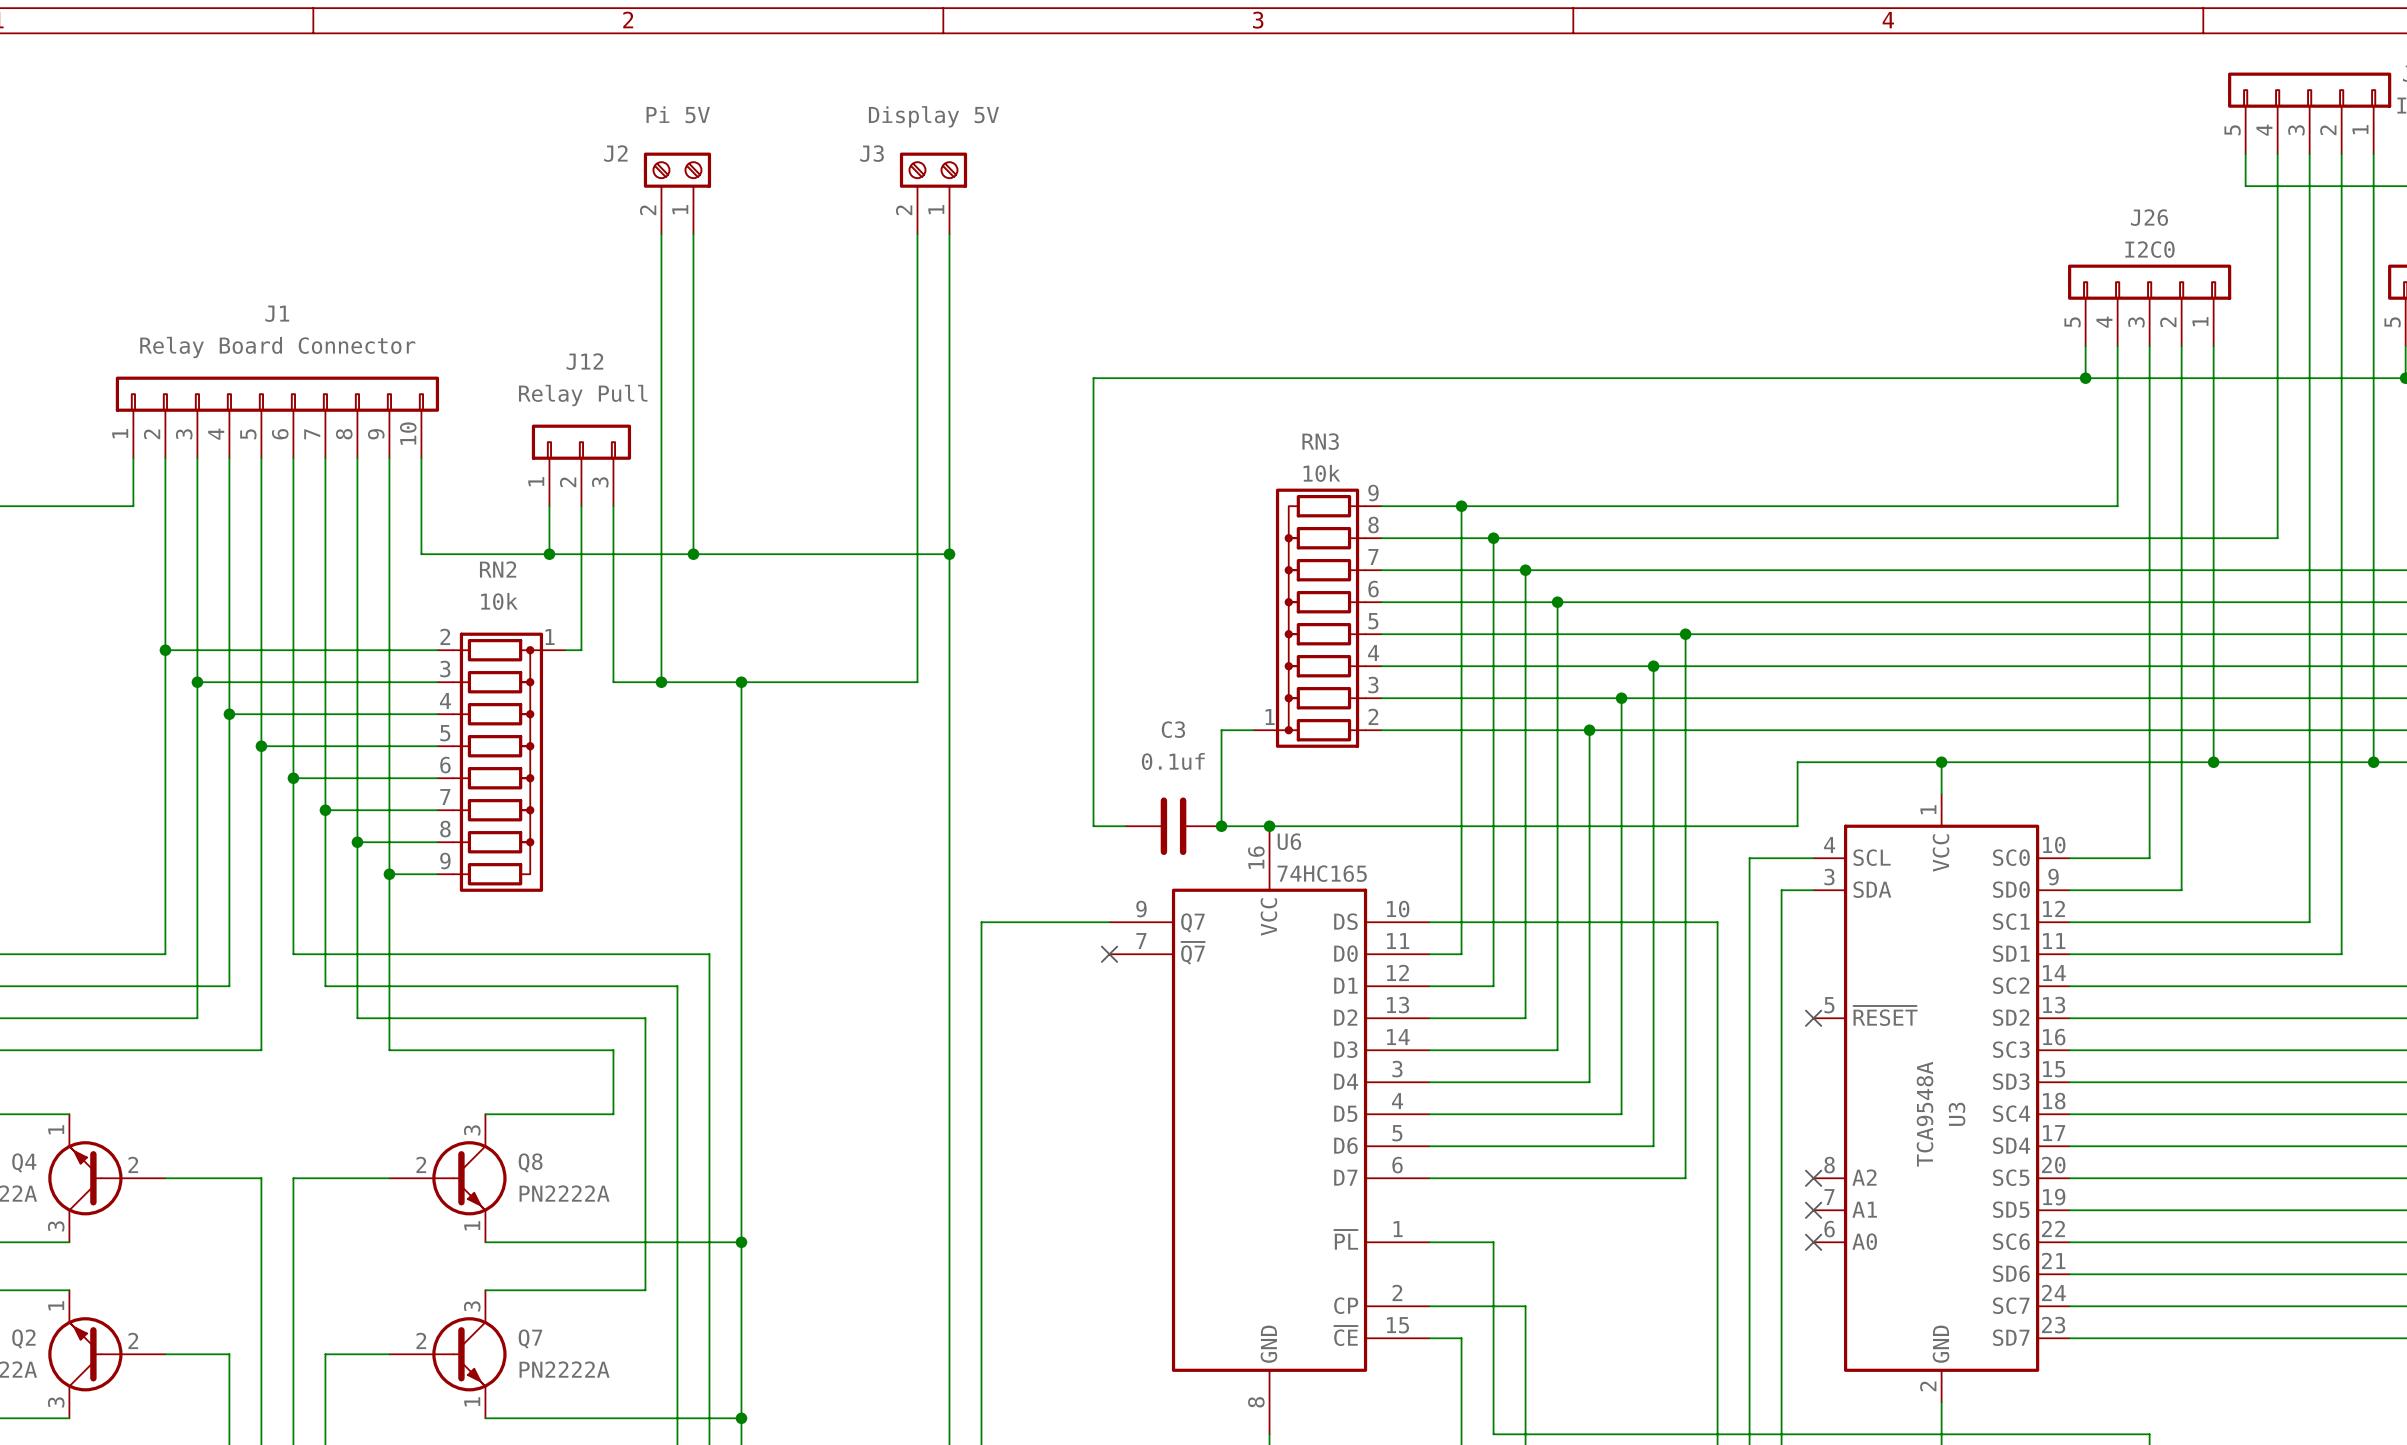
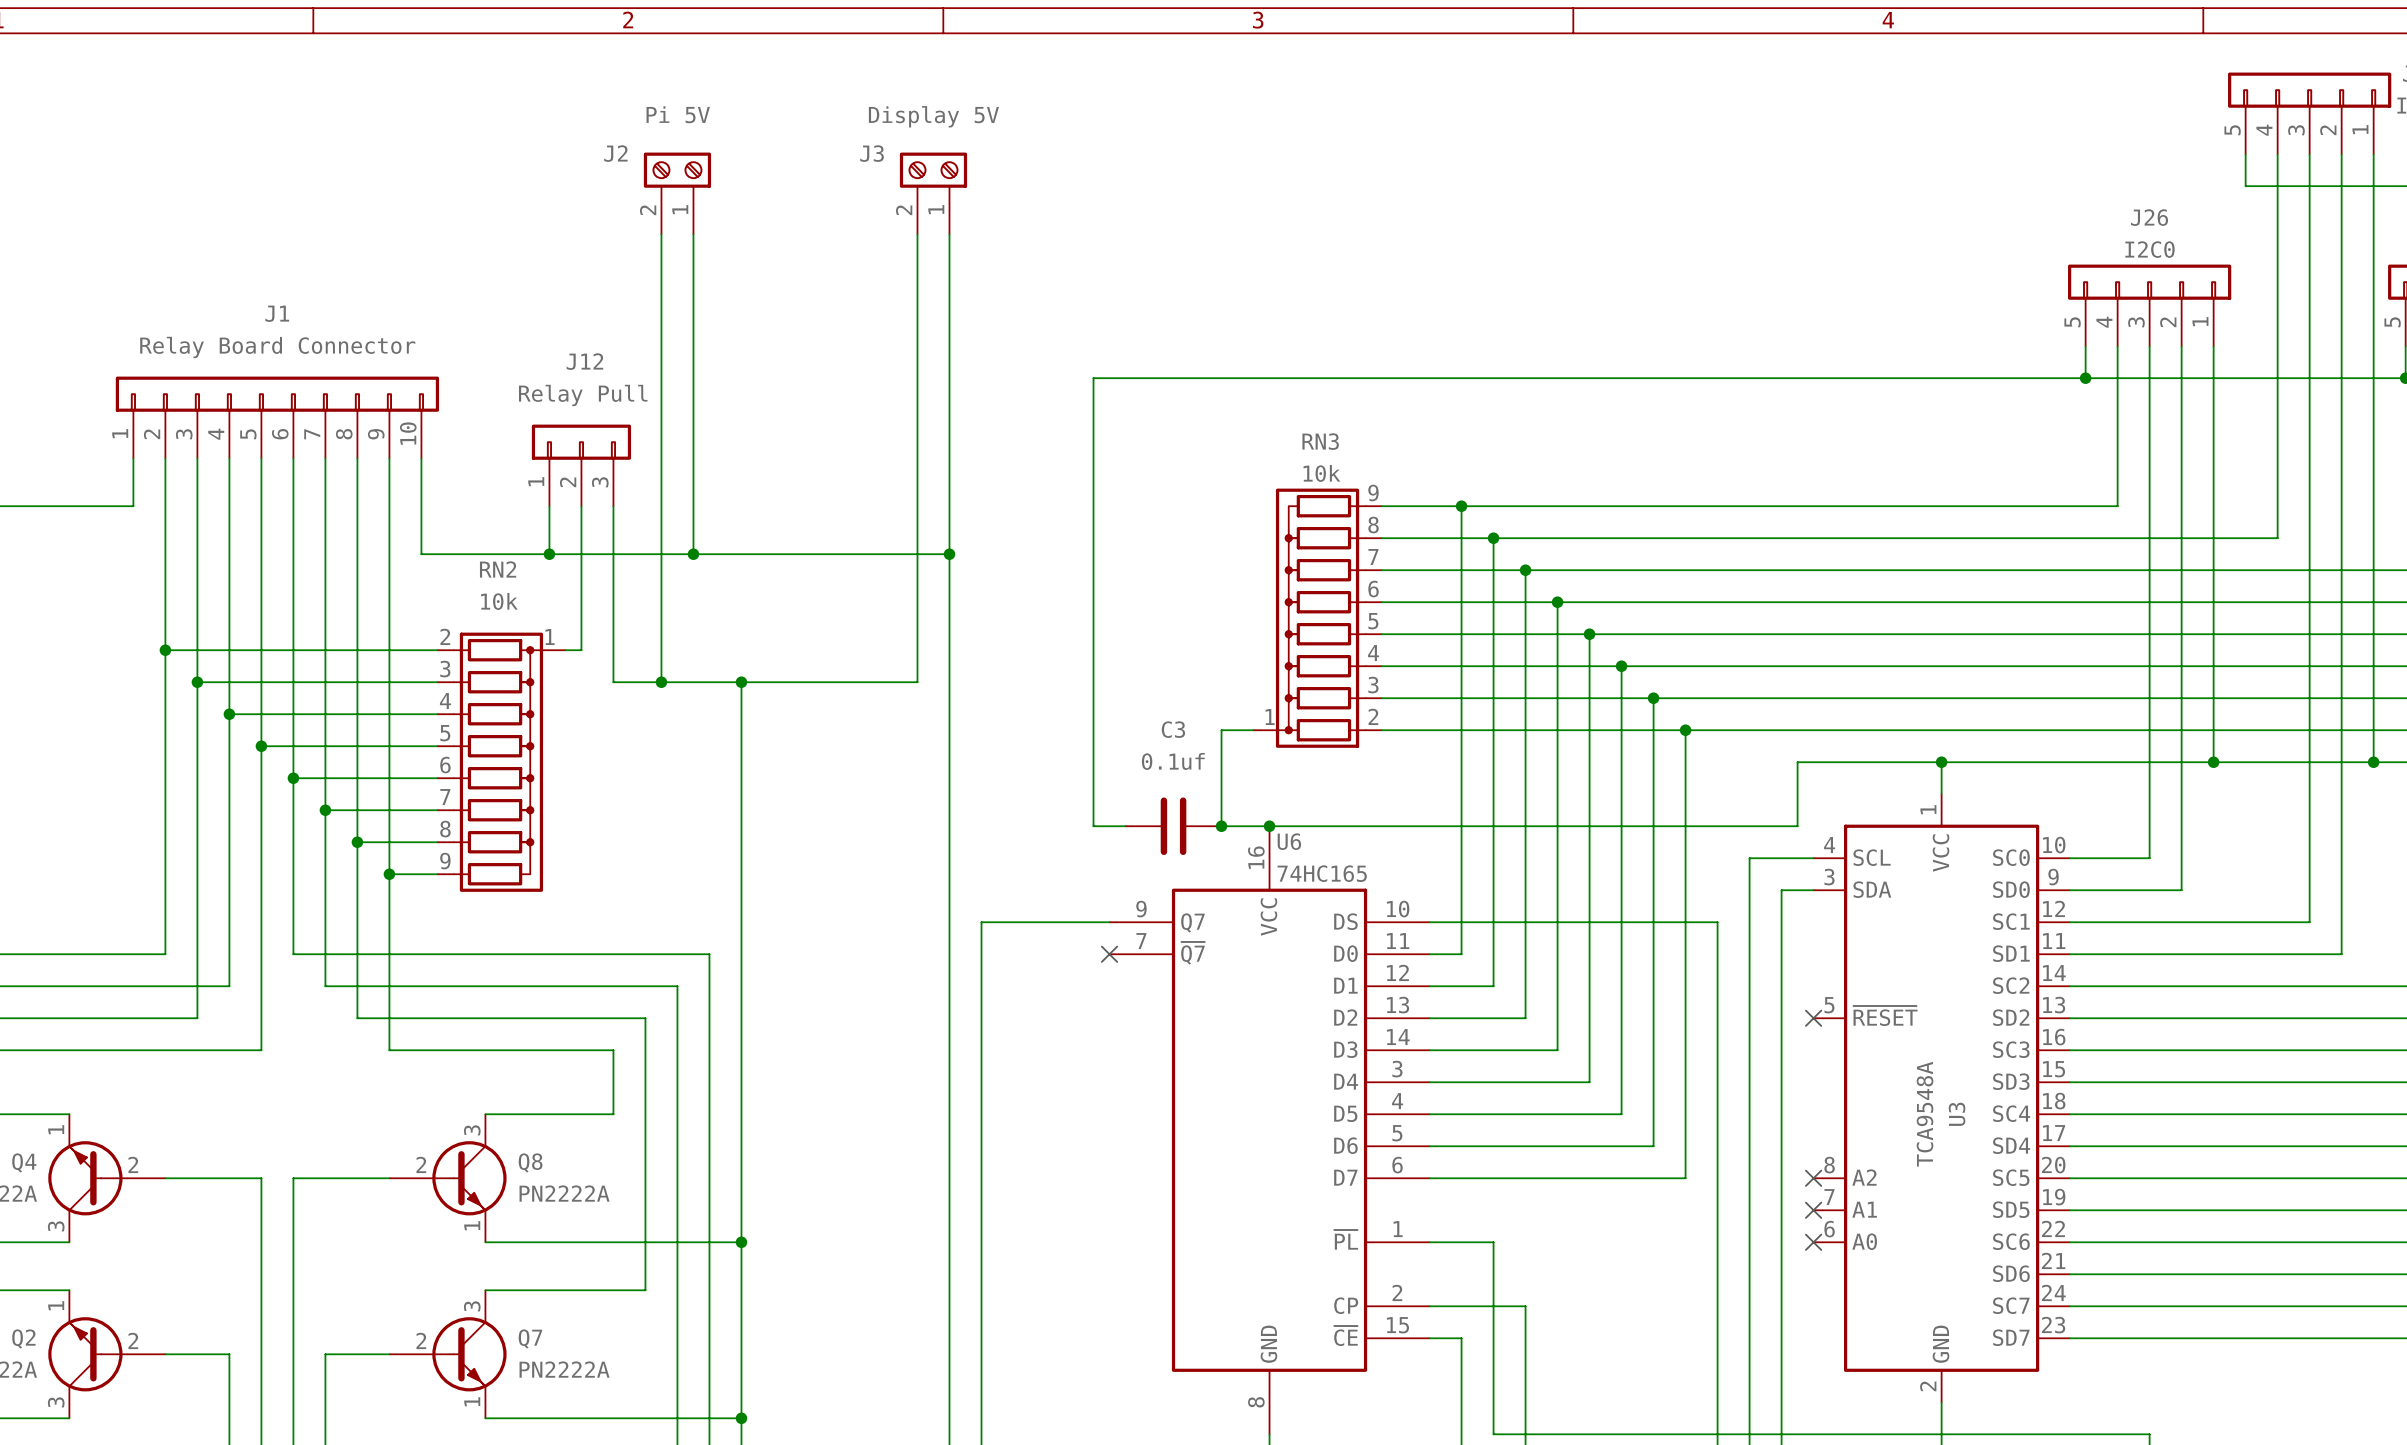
junction: none -> (1589, 634)
wire: (1685, 634) (1685, 730) -> (1589, 634) (1589, 730)
junction: (1685, 634) -> none
junction: none -> (1621, 666)
wire: (1653, 666) (1653, 698) -> (1621, 666) (1621, 698)
junction: (1653, 666) -> none
junction: (1621, 698) -> none
junction: none -> (1653, 698)
junction: (1589, 730) -> none
junction: none -> (1685, 730)

